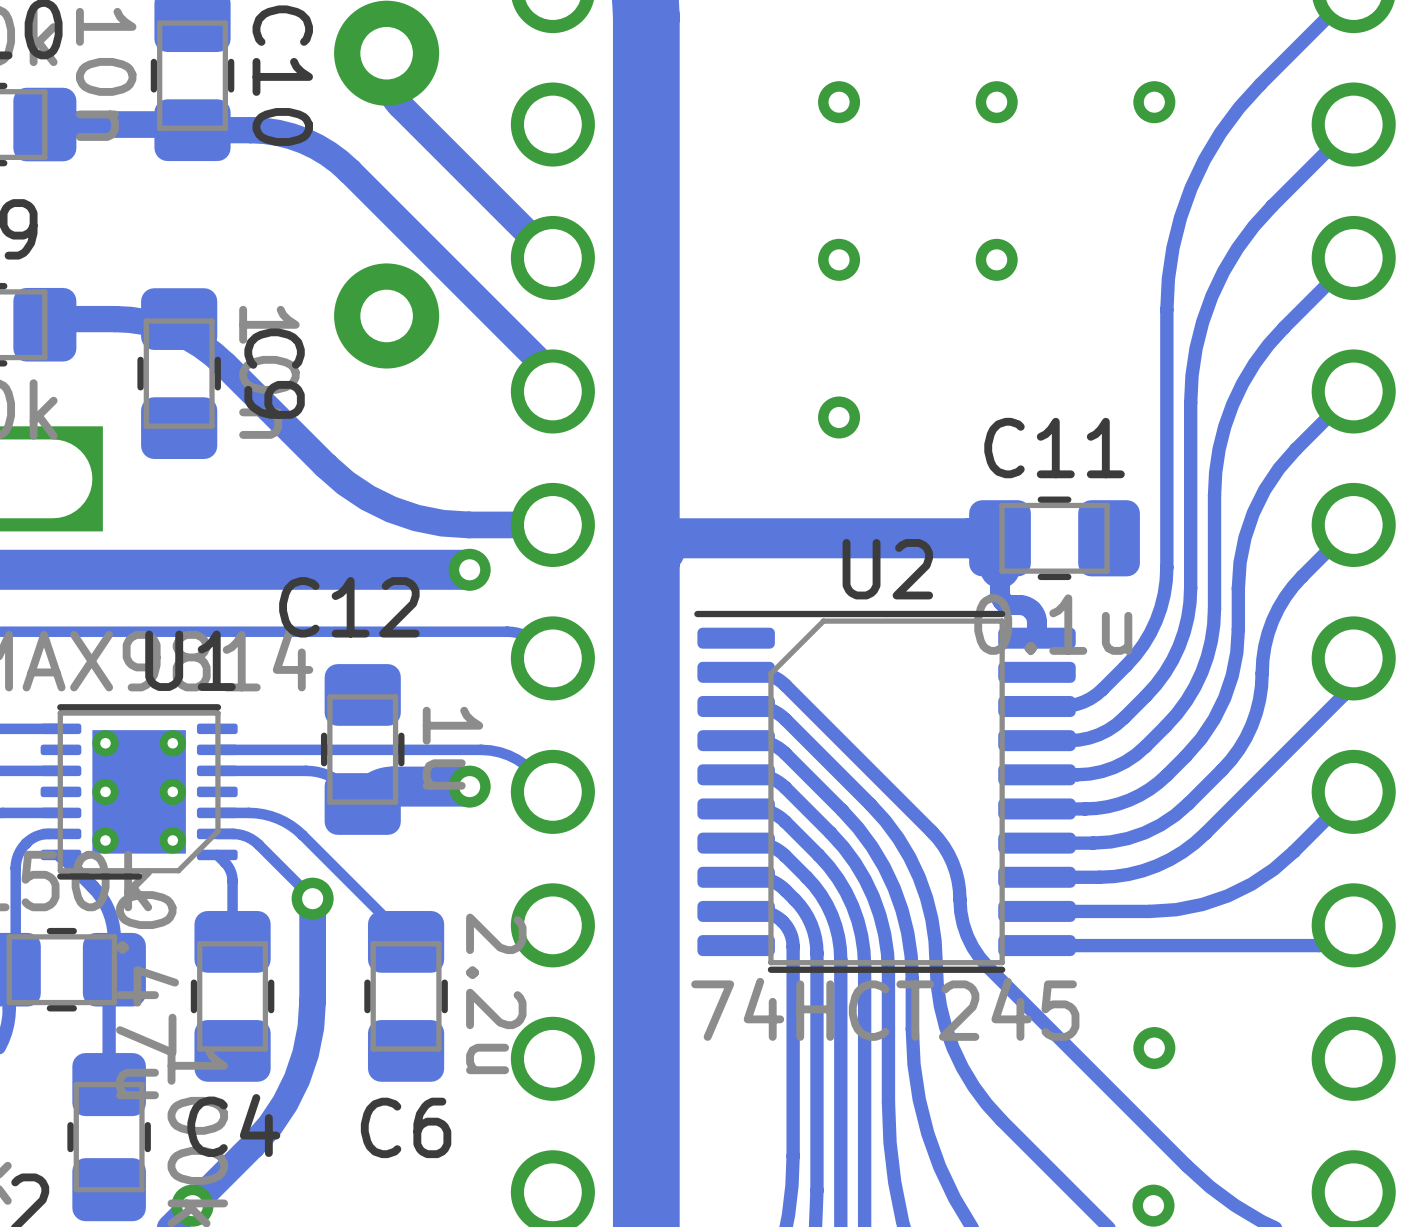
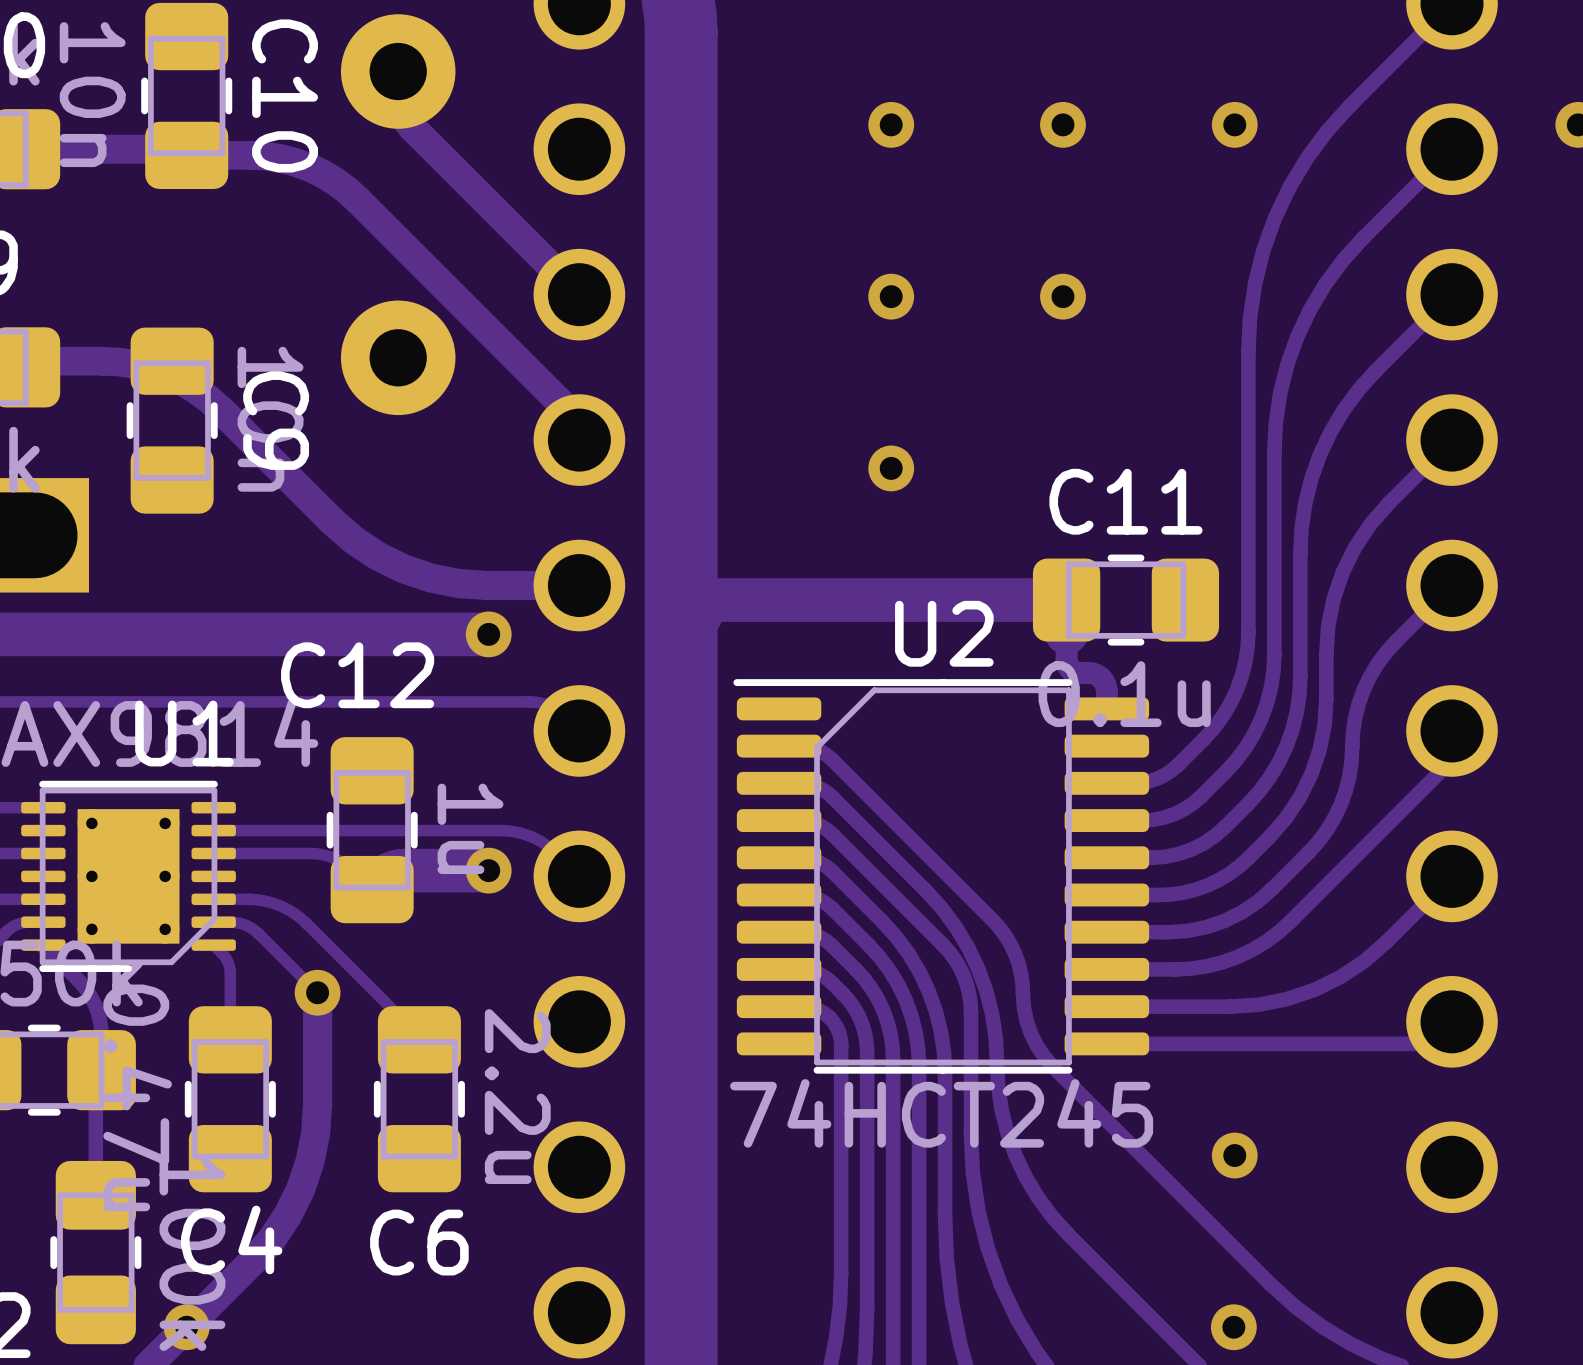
track: (842, 810) (872, 846) (894, 888) (907, 932) (912, 979) -> (894, 896) (949, 952) (963, 975) (970, 1003) (971, 1080)

